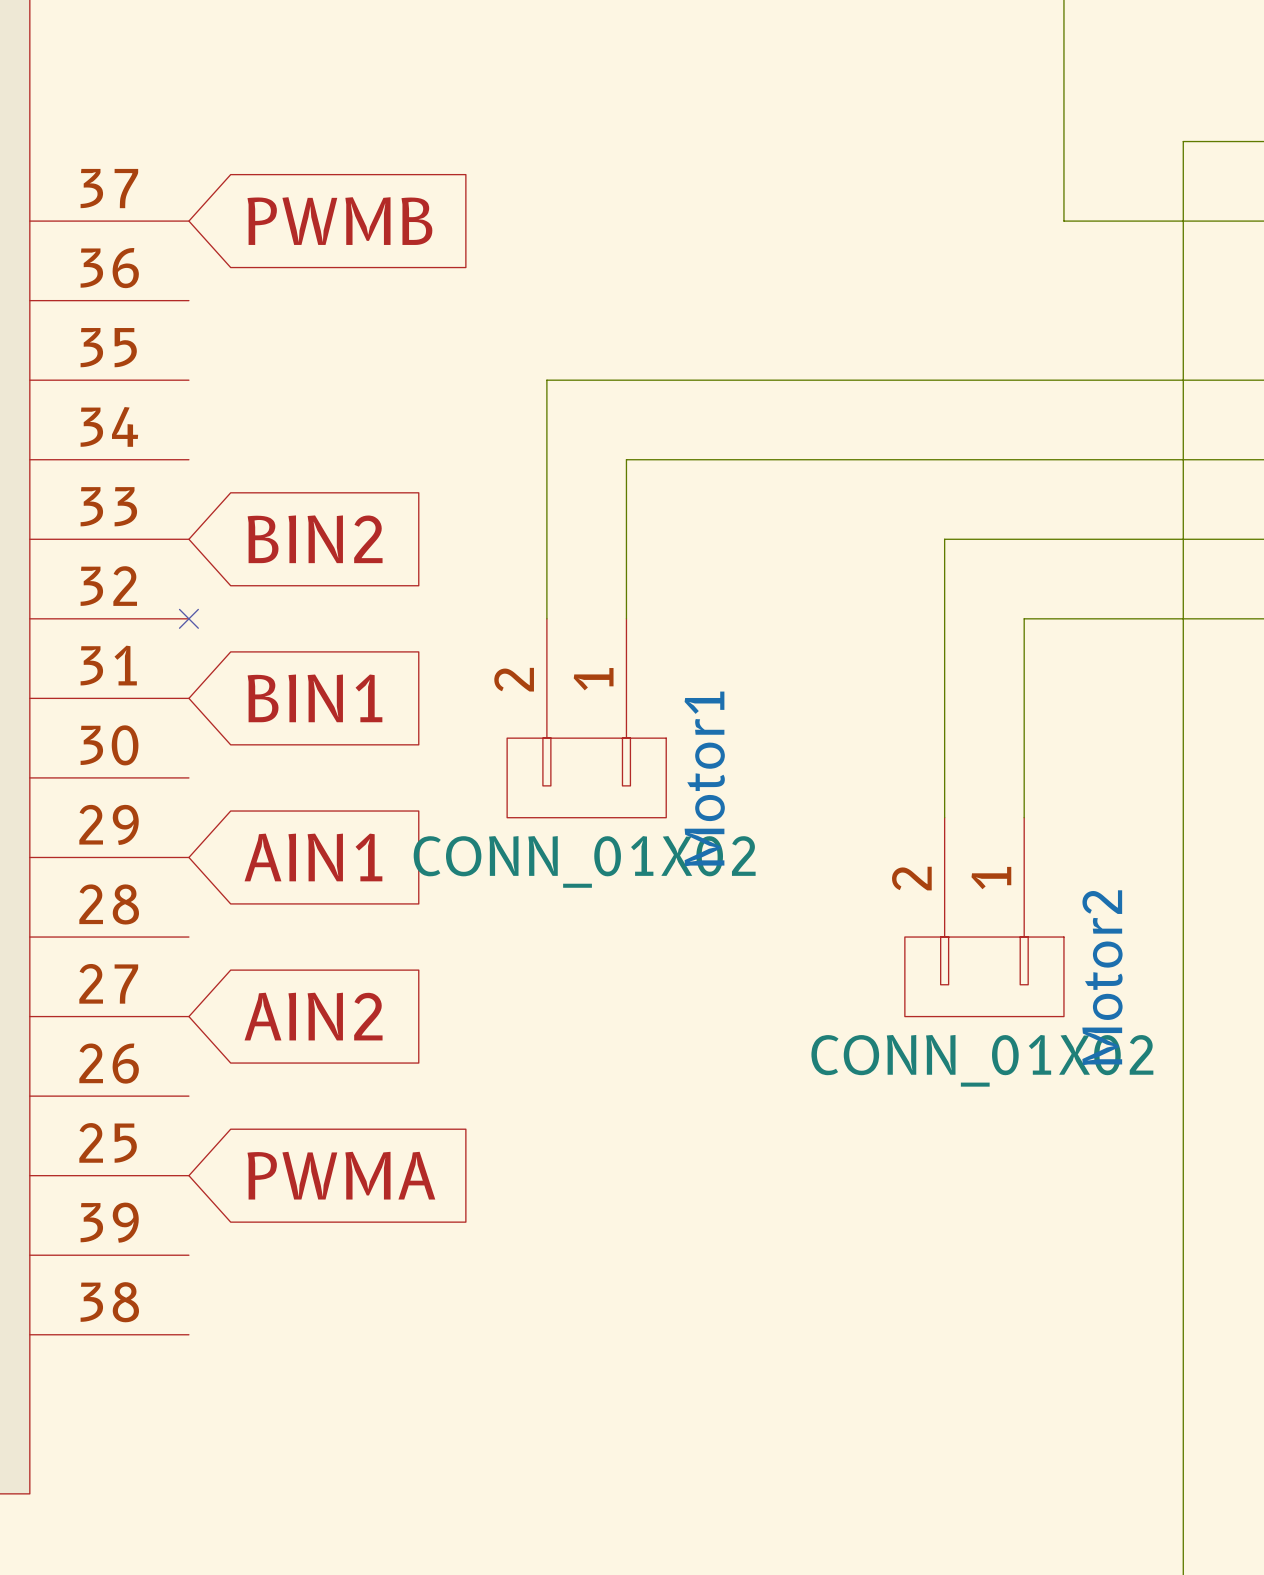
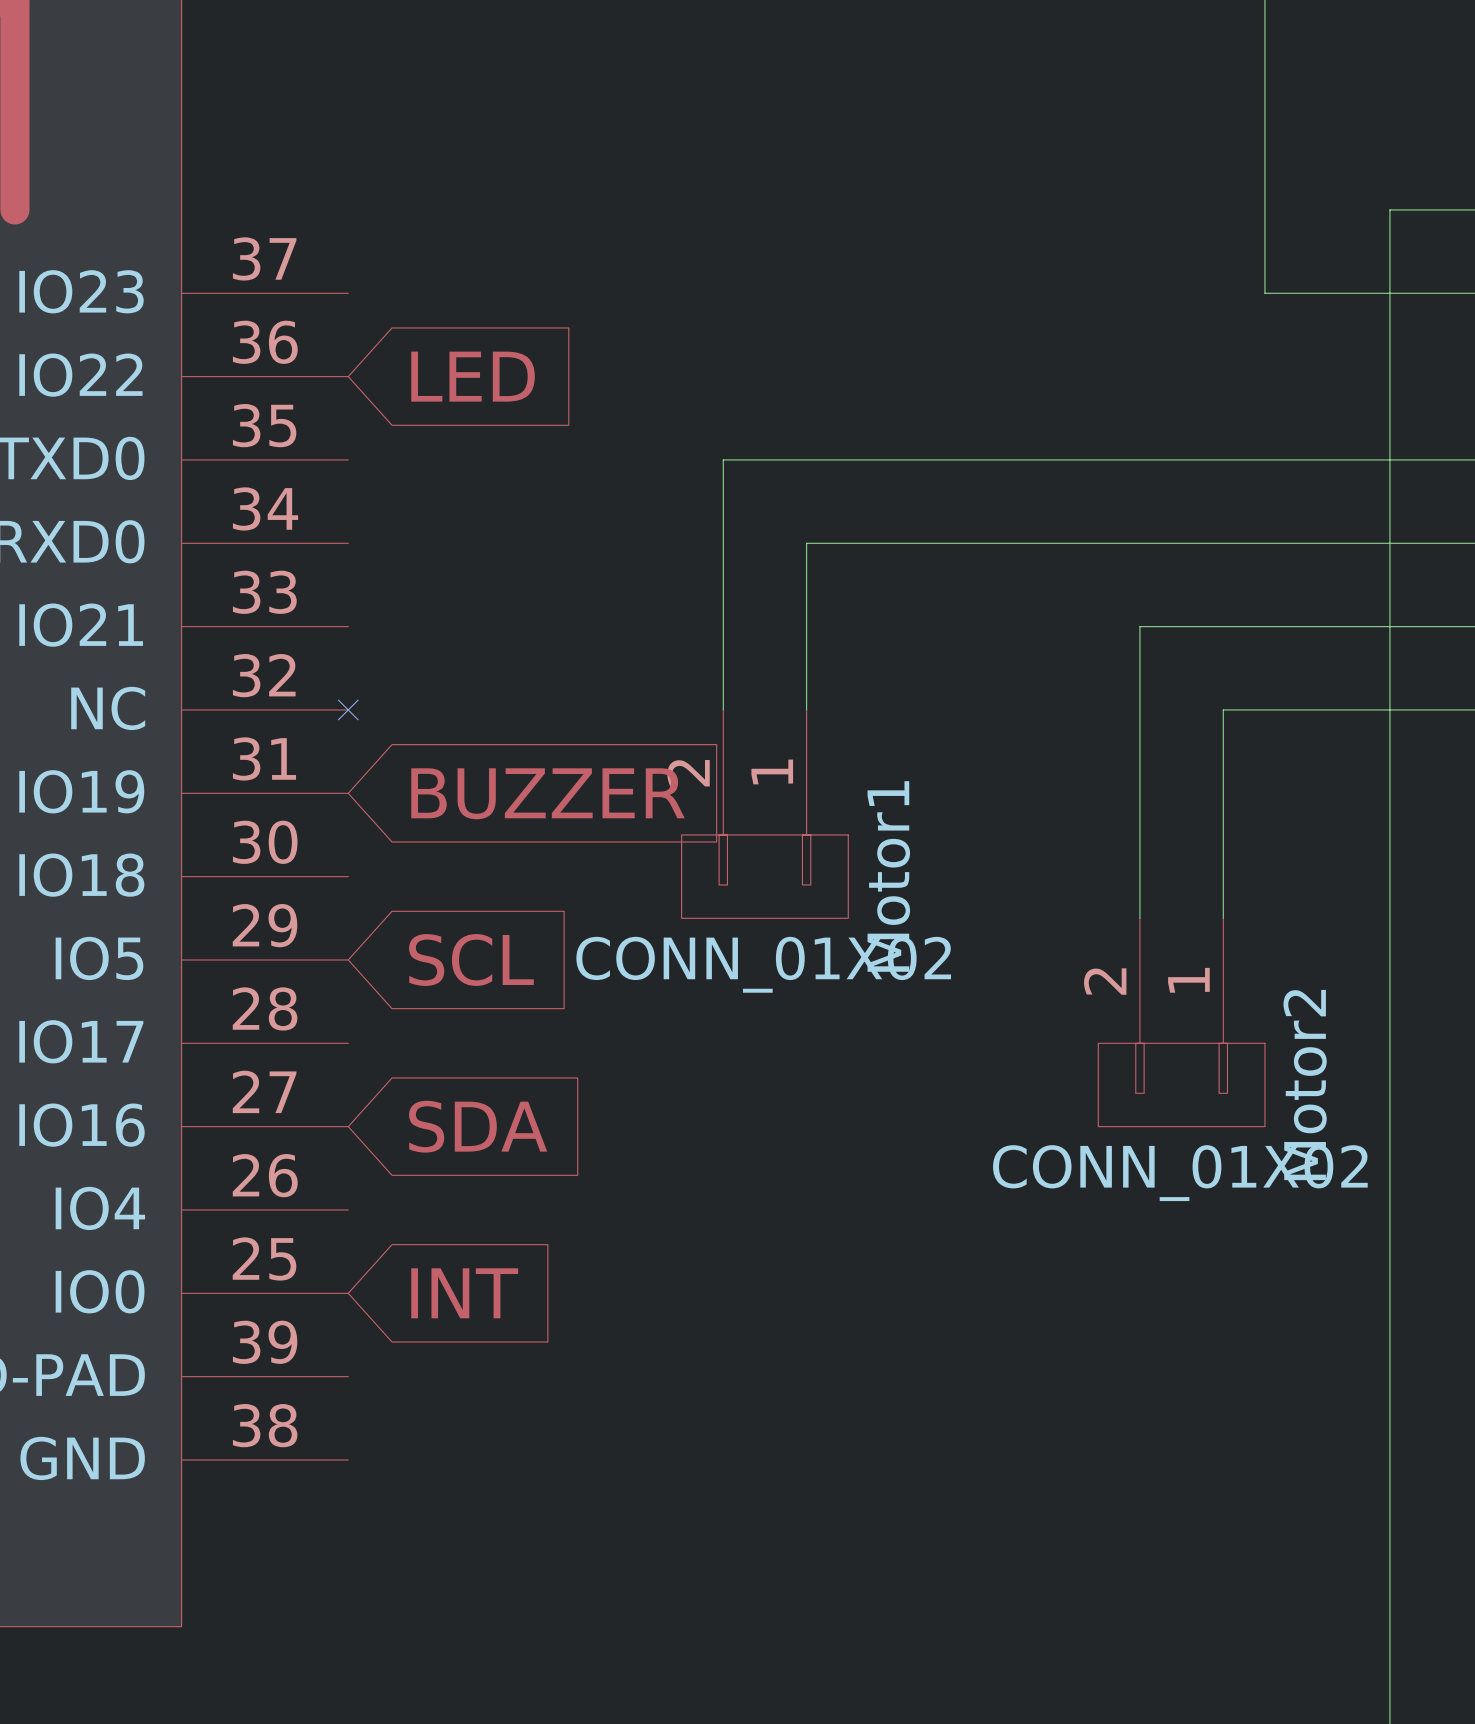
global label: PWMB (339, 221) -> none
global label: none -> LED (473, 376)
global label: BIN2 (315, 539) -> none
global label: BIN1 (315, 698) -> BUZZER (548, 793)
global label: AIN1 (313, 857) -> SCL (471, 960)
global label: AIN2 (313, 1016) -> SDA (478, 1126)
global label: PWMA (341, 1175) -> INT (464, 1293)

